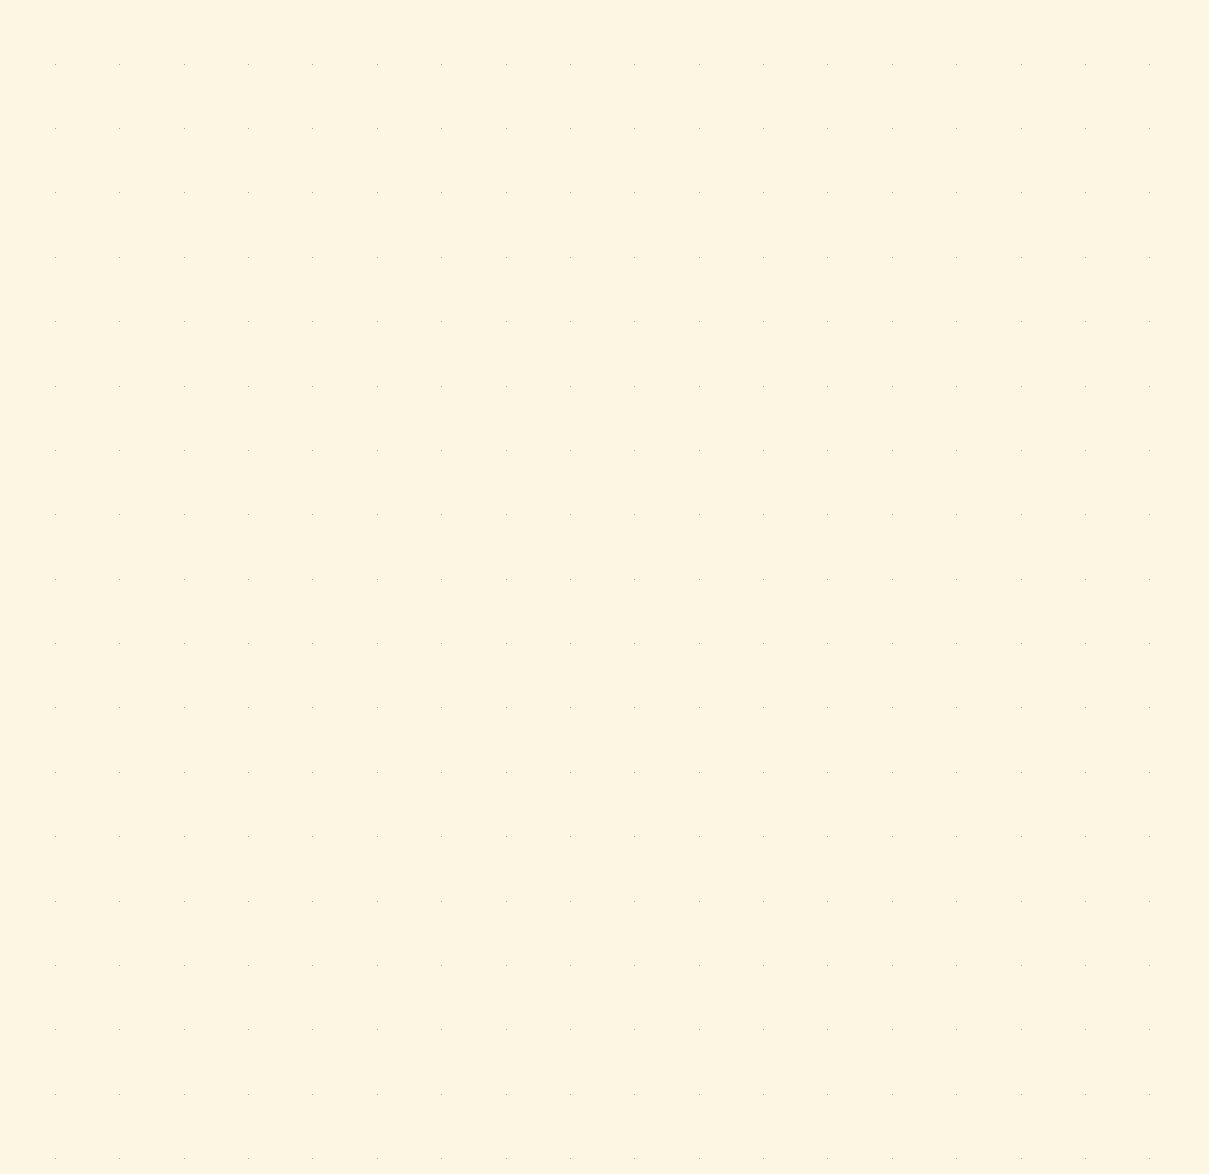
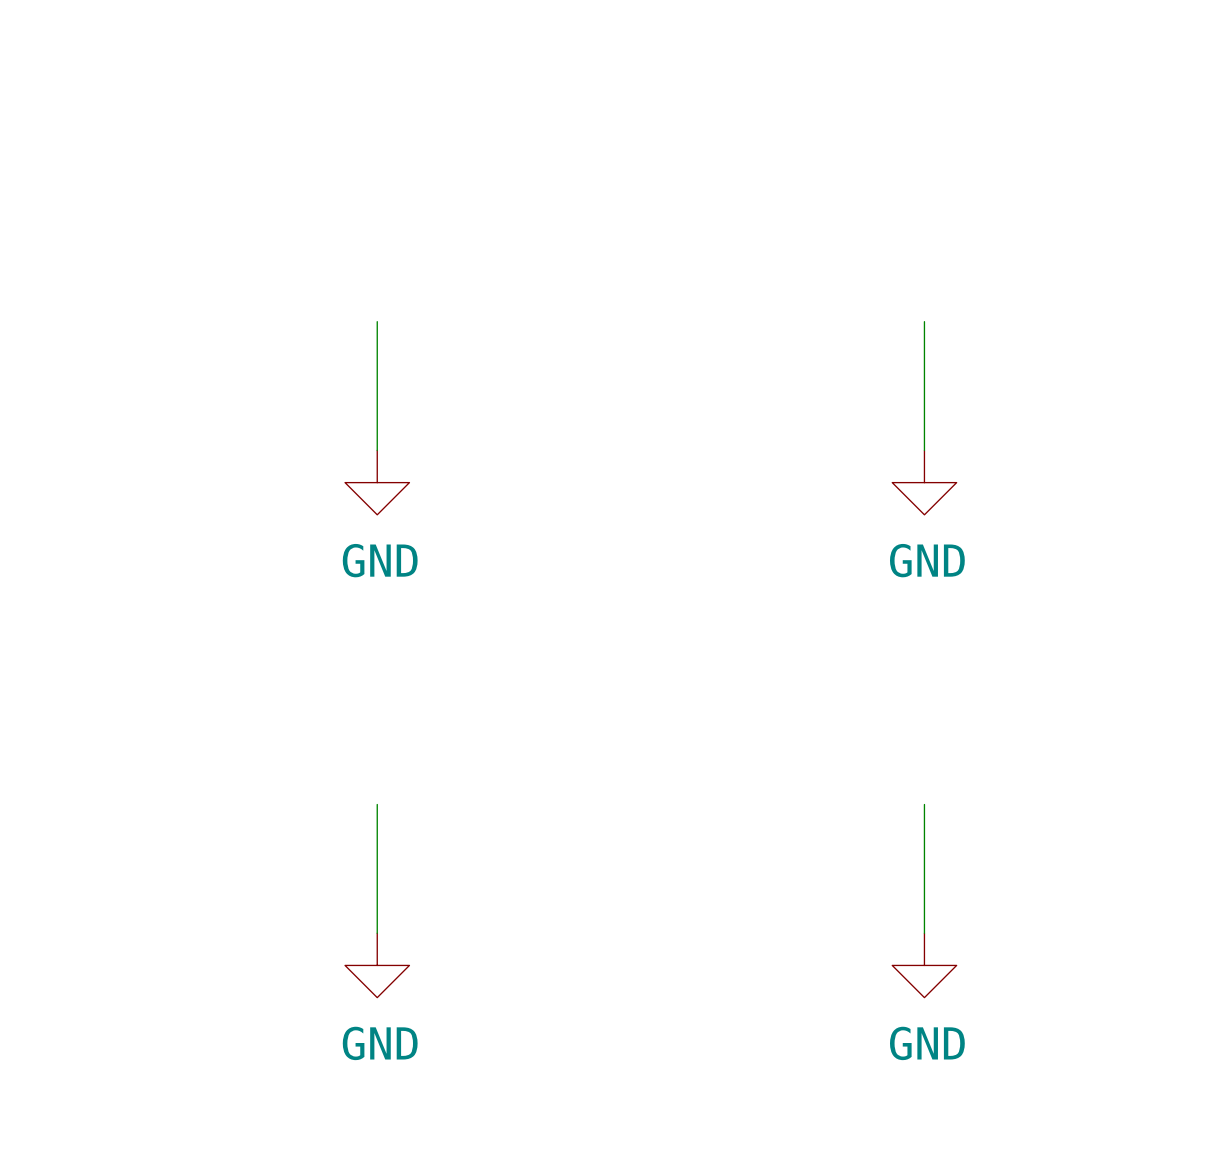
wire: none -> (377, 321) (377, 450)
wire: none -> (924, 321) (924, 450)
power symbol: none -> GND (377, 482)
power symbol: none -> GND (924, 482)
wire: none -> (377, 804) (377, 933)
wire: none -> (924, 804) (924, 933)
power symbol: none -> GND (377, 965)
power symbol: none -> GND (924, 965)

